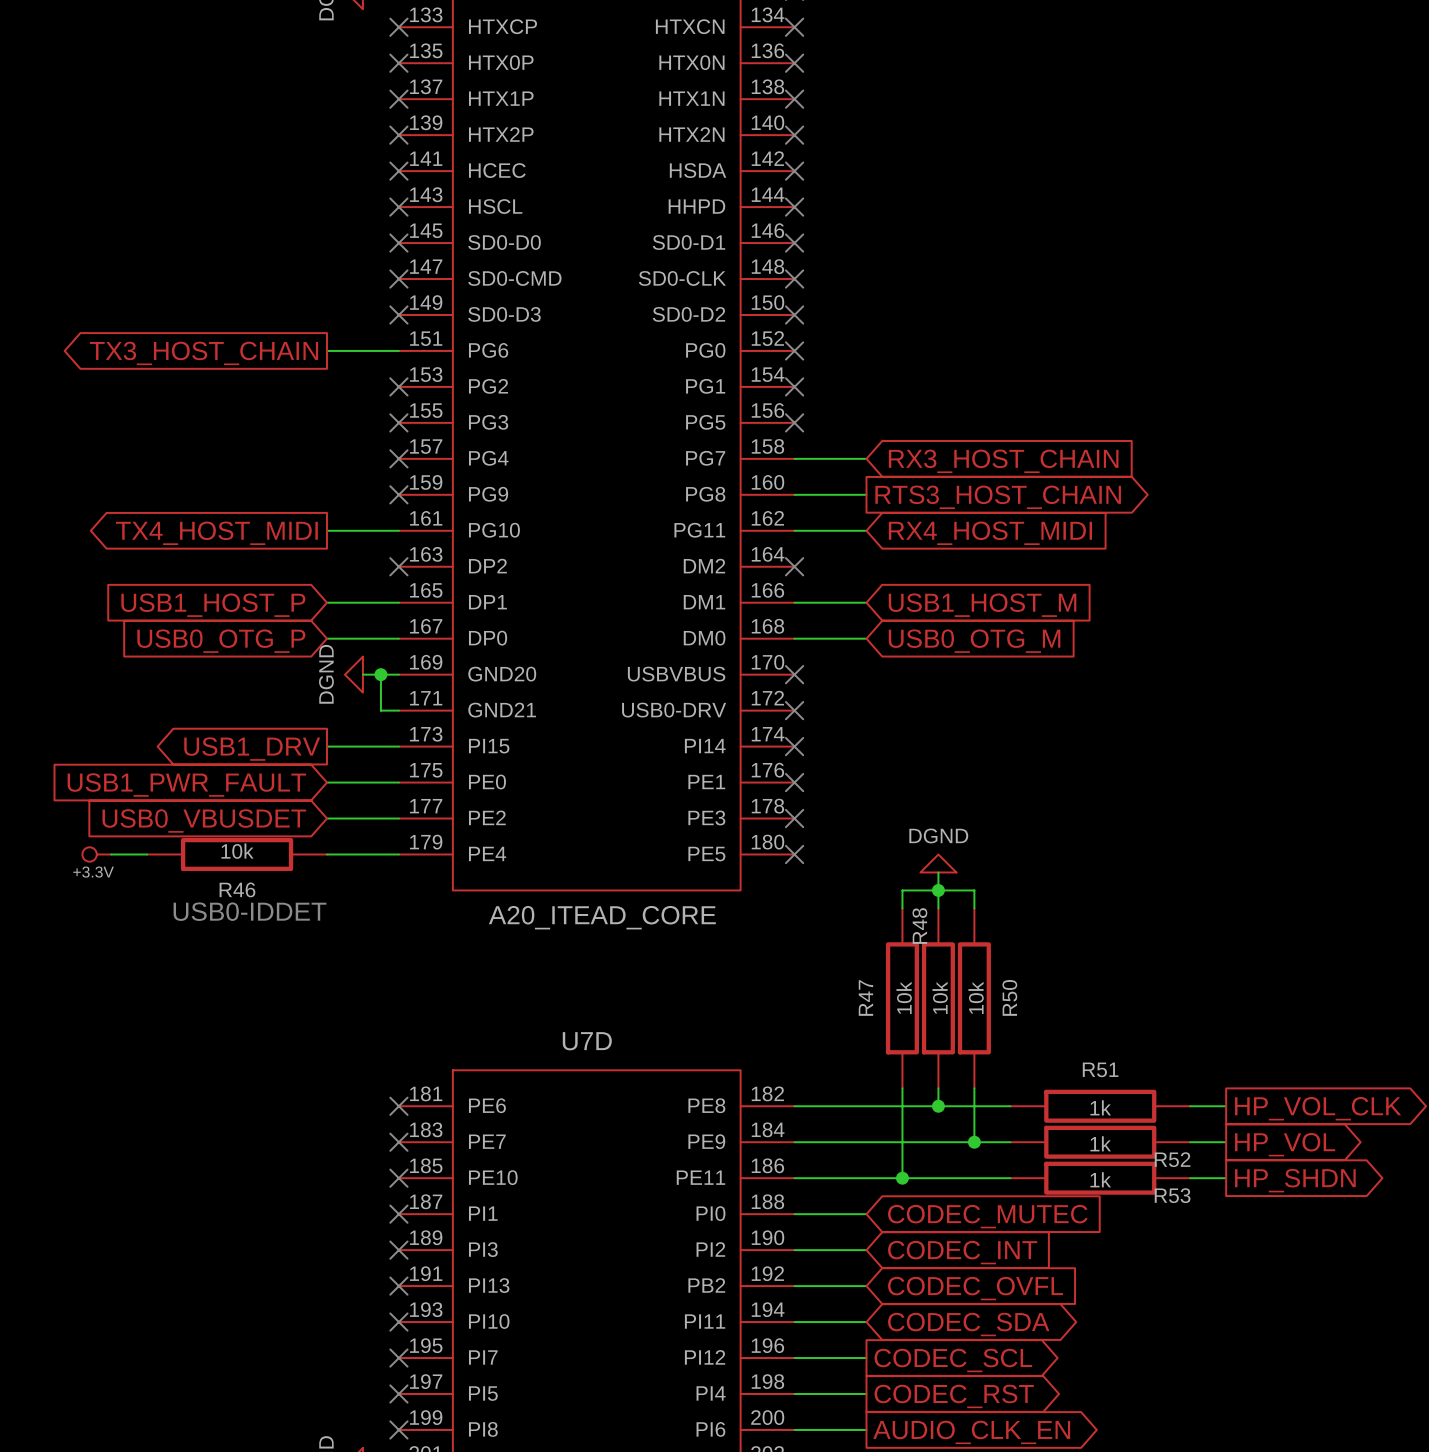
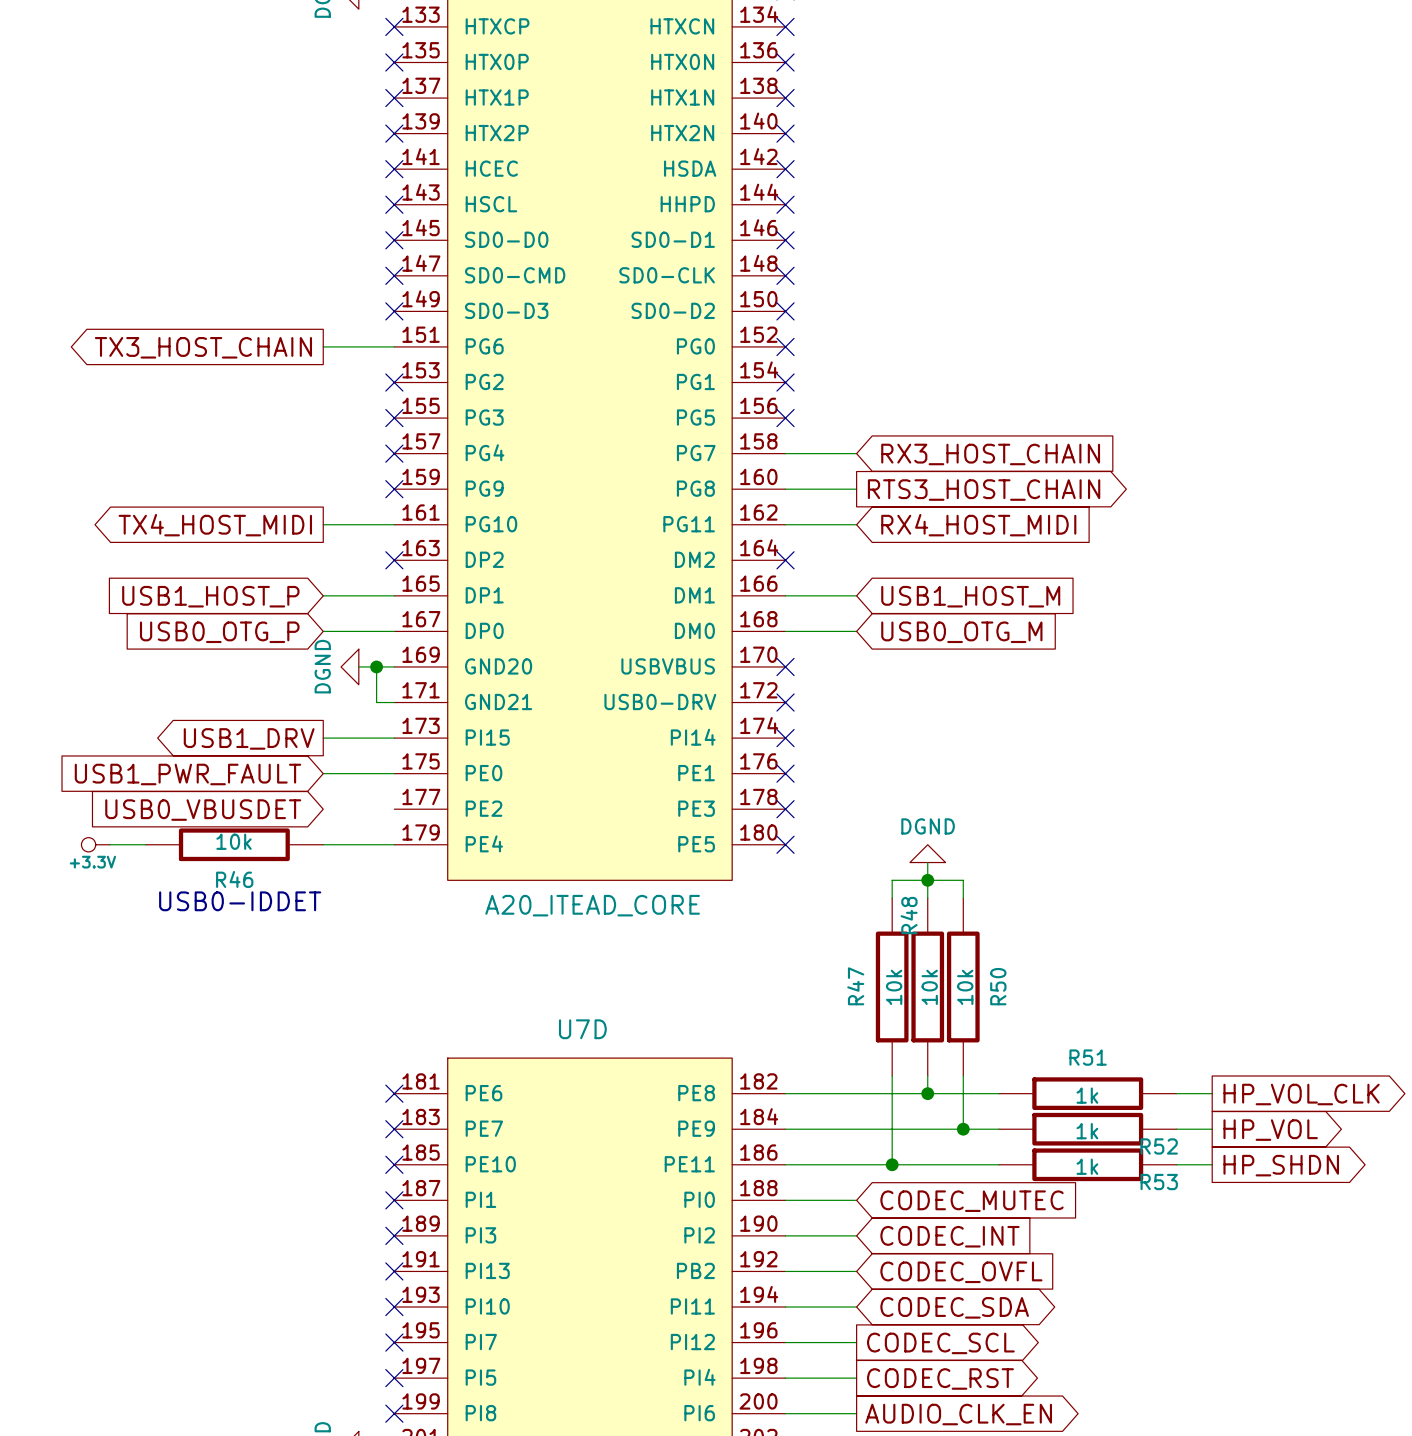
wire: (326, 818) (398, 818) -> none

